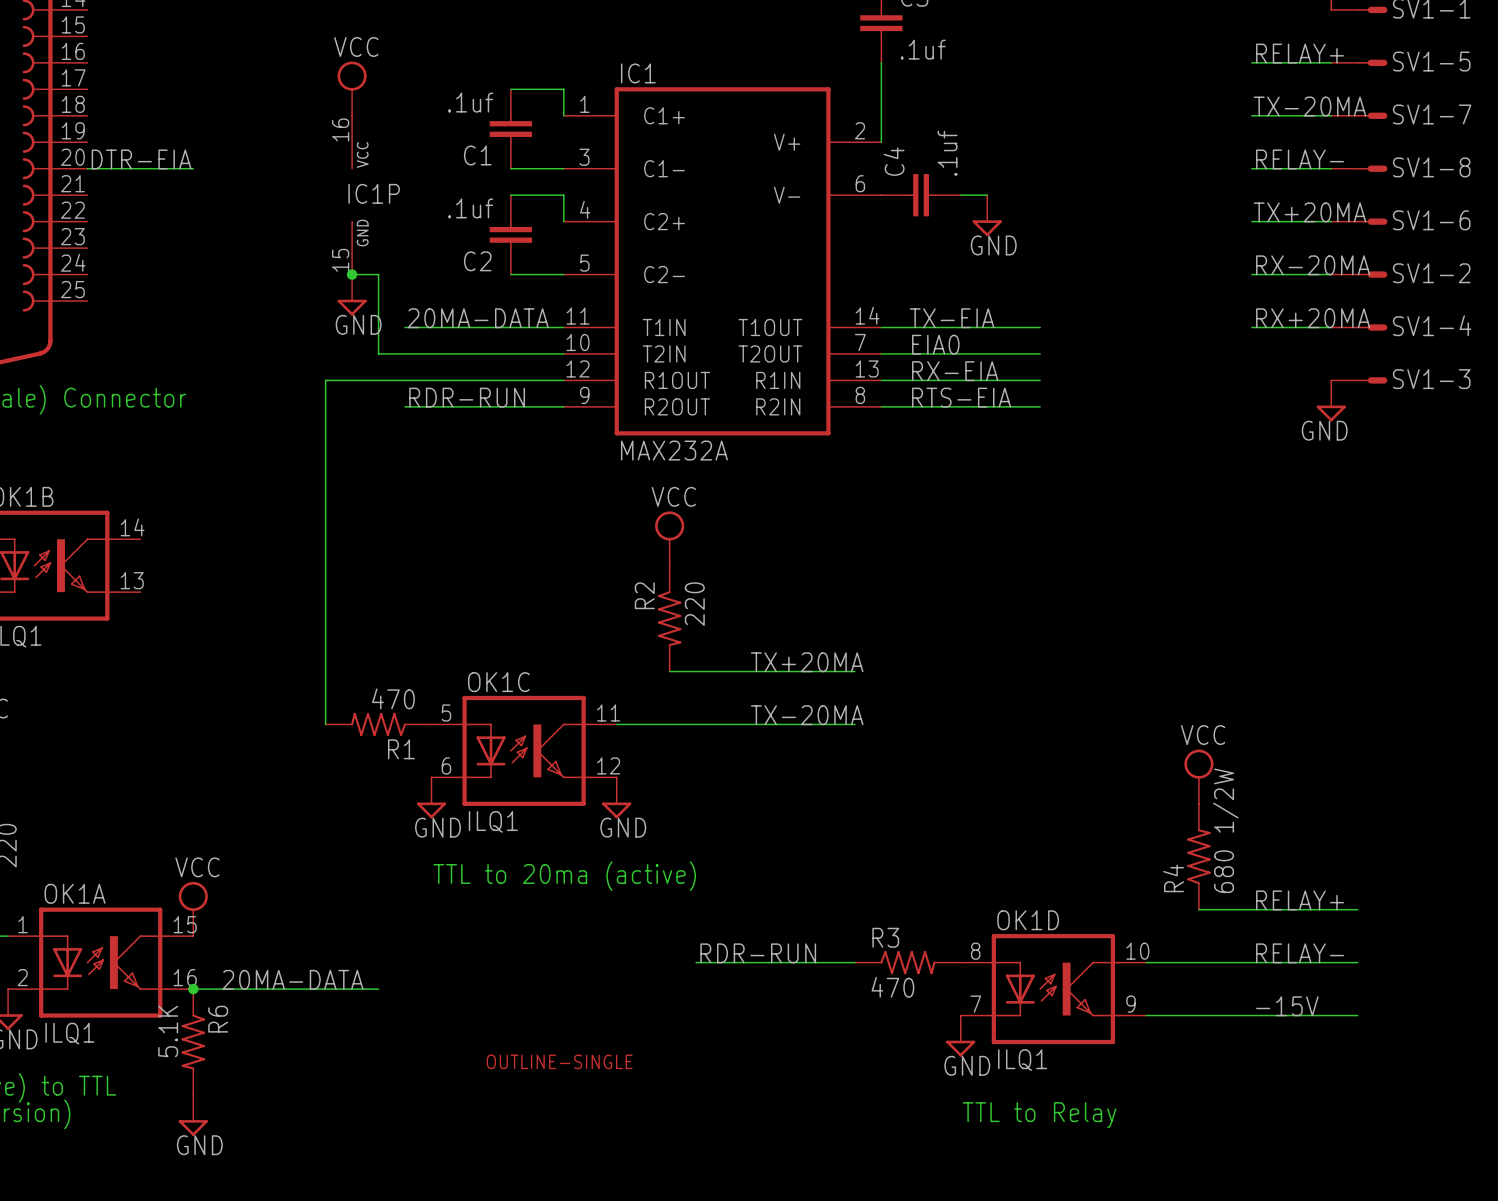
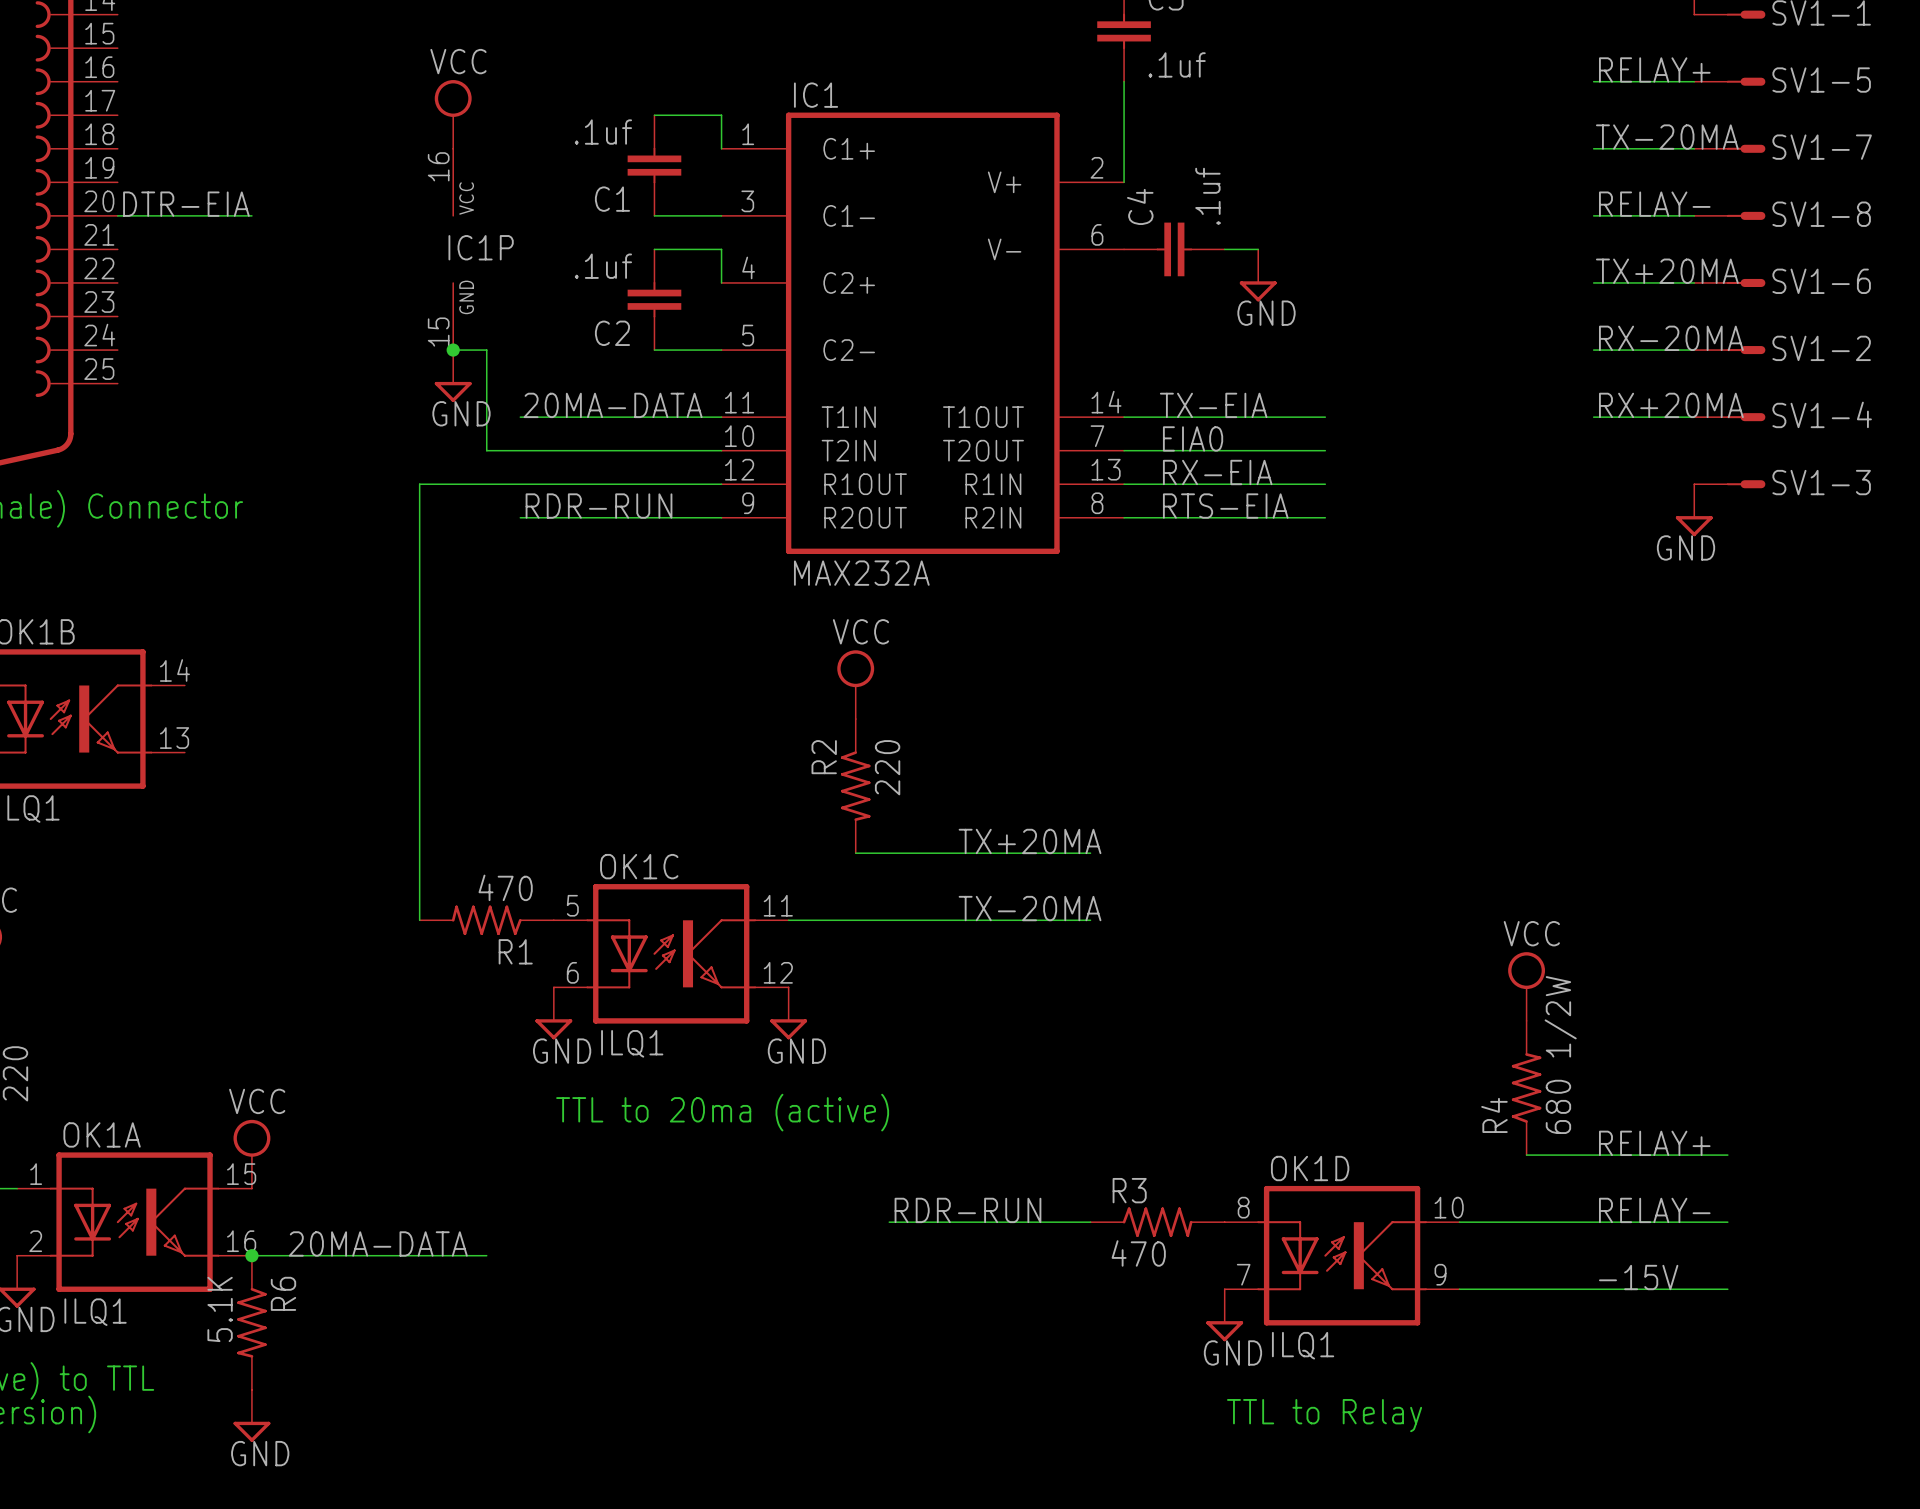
part: OUTLINE-SINGLE (559, 1061) -> none

